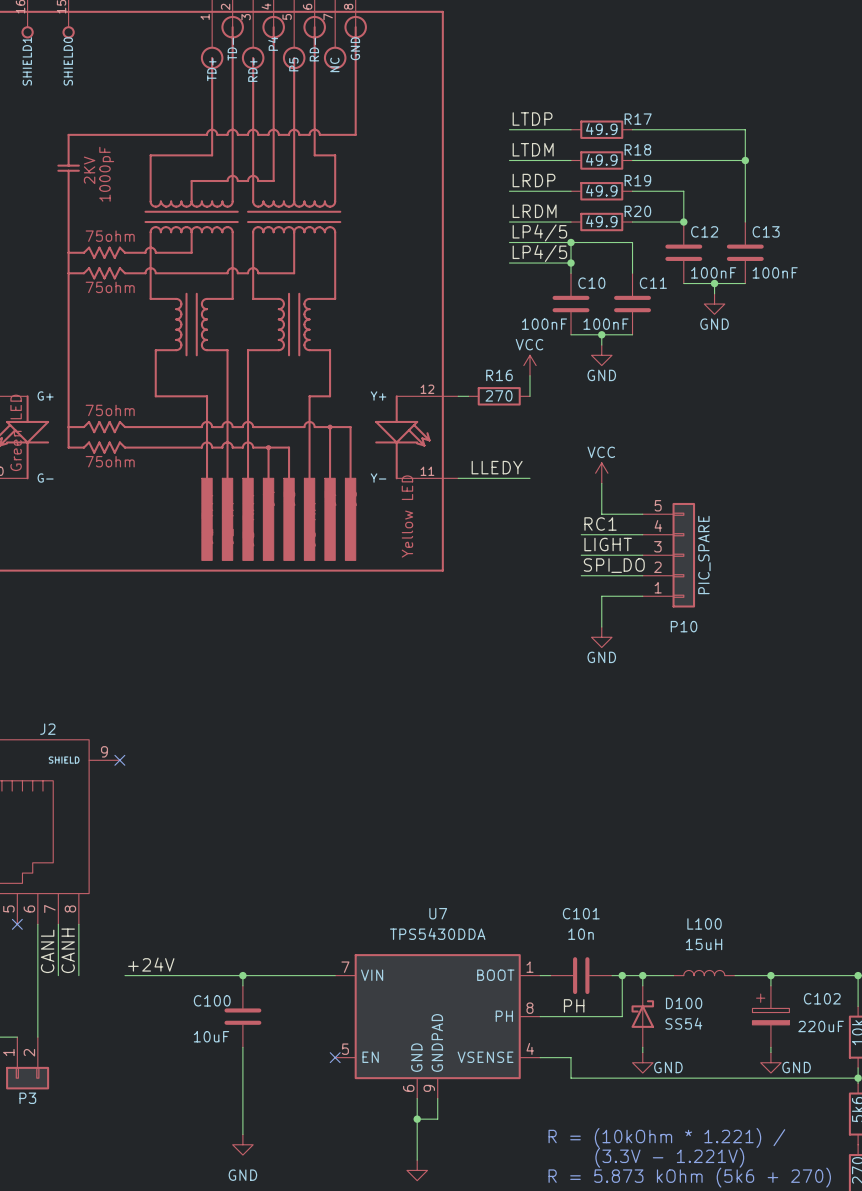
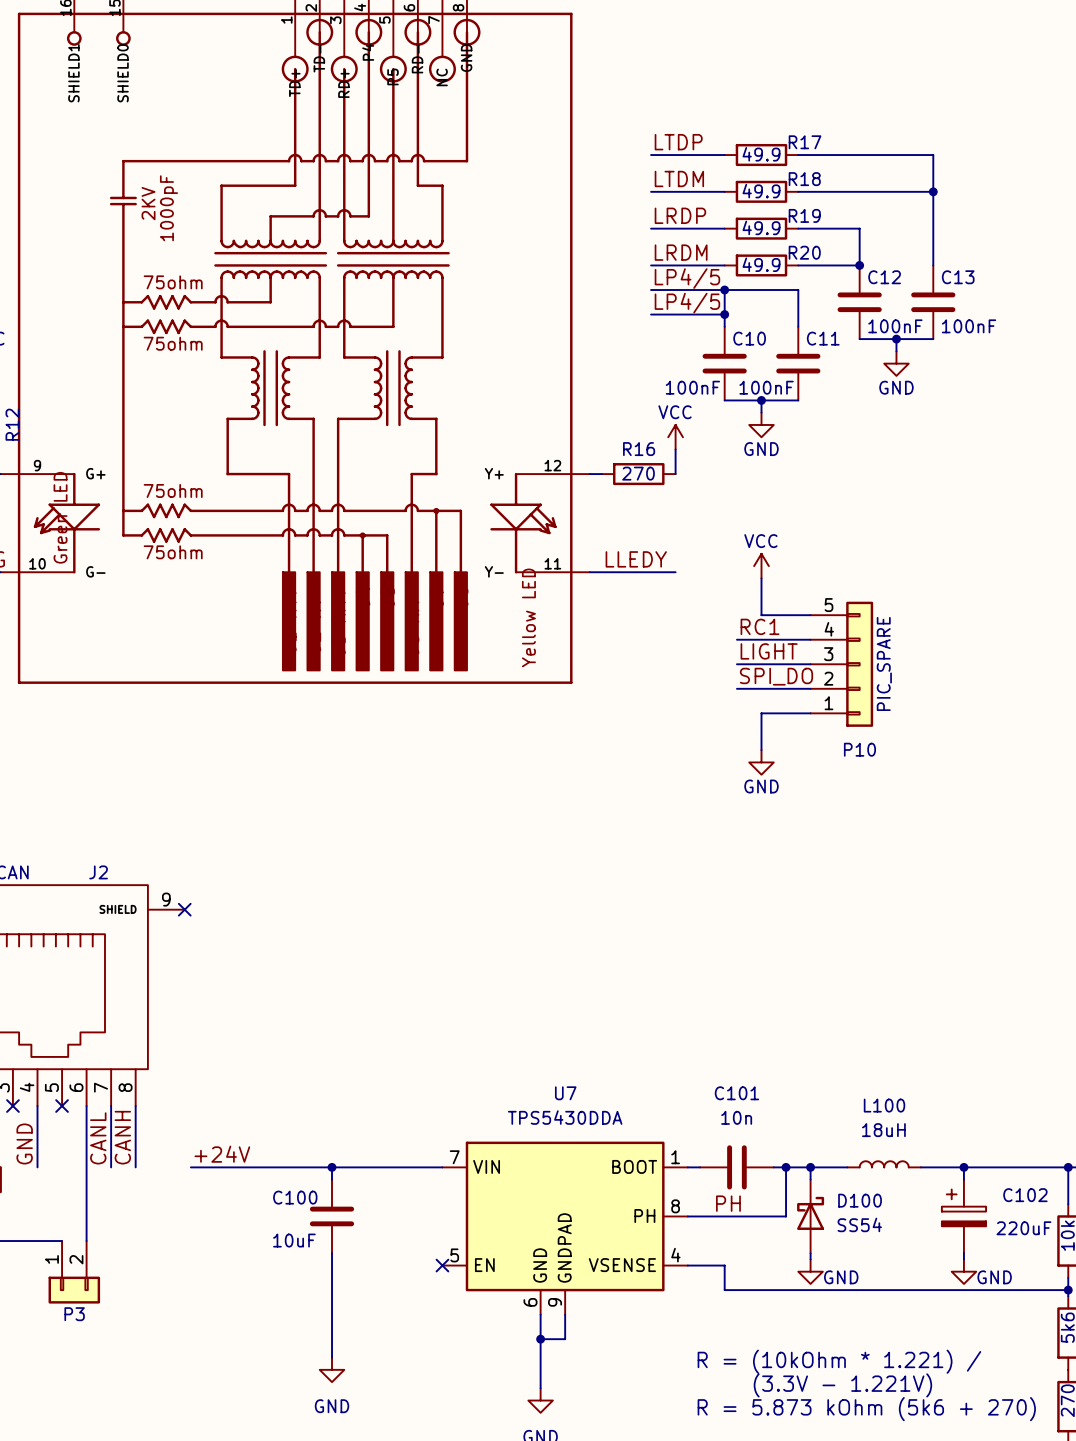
L100 value: 15uH (704, 944) -> 18uH (883, 1130)

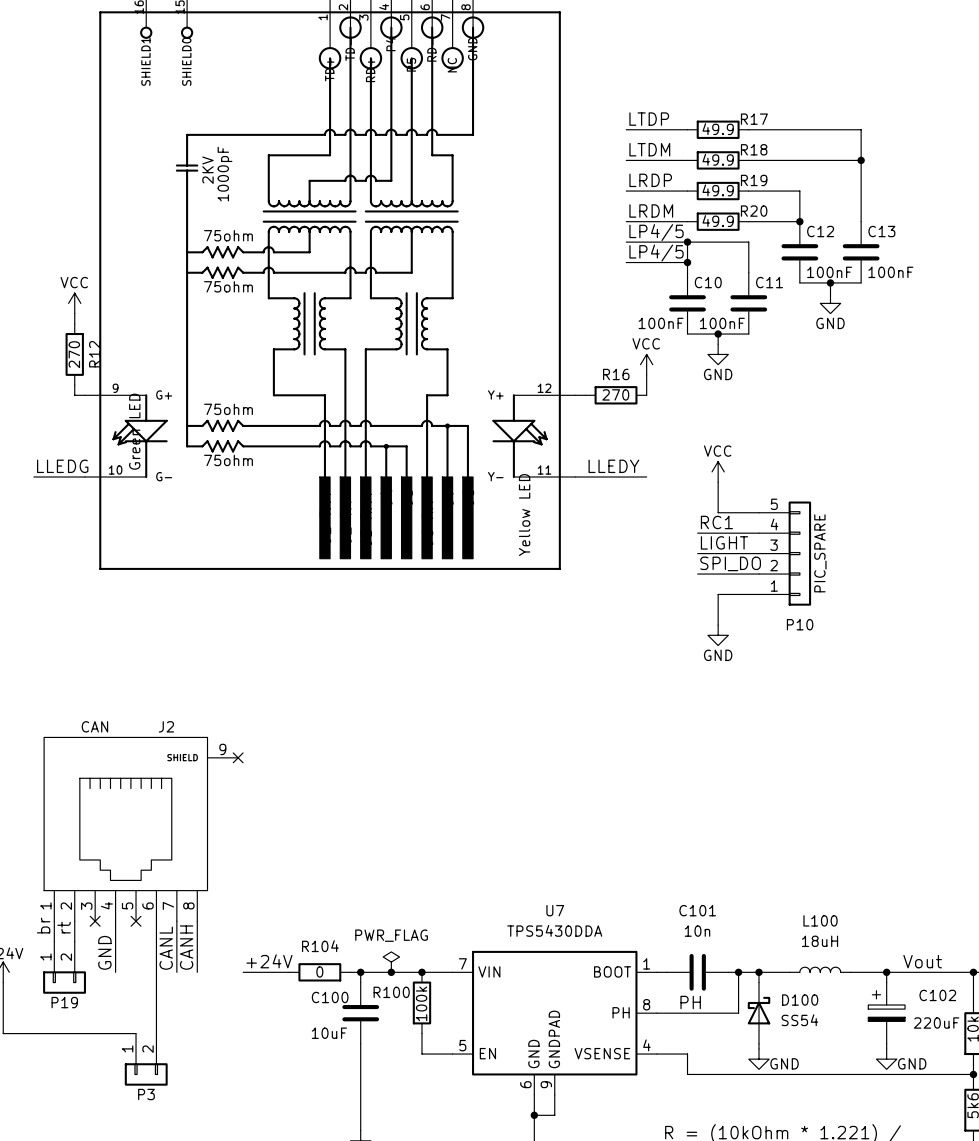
label: none -> Vout (922, 961)
power symbol: none -> PWR_FLAG (391, 962)
wire: (246, 1167) (319, 1167) -> none
R104: none -> 0 (319, 972)
junction: none -> (391, 972)
junction: none -> (421, 972)
R100: none -> 100k (421, 1002)
wire: none -> (421, 1033) (421, 1054) (452, 1054)
no-connect mark: (442, 1265) -> none

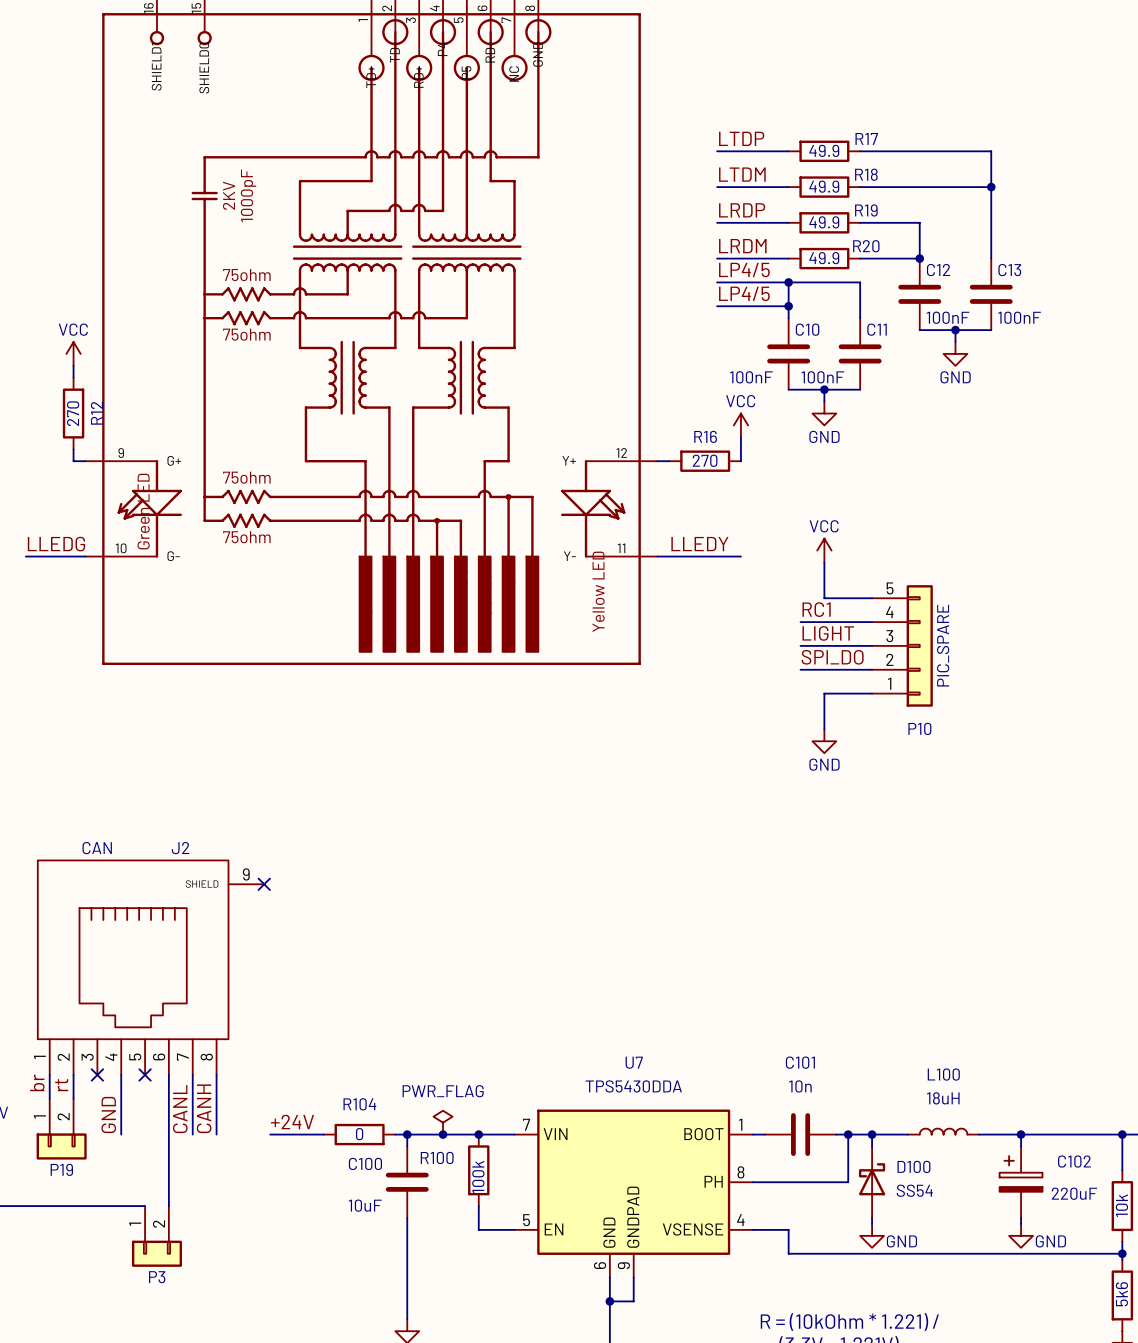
label: Vout (922, 961) -> none
label: PH (690, 1002) -> none

